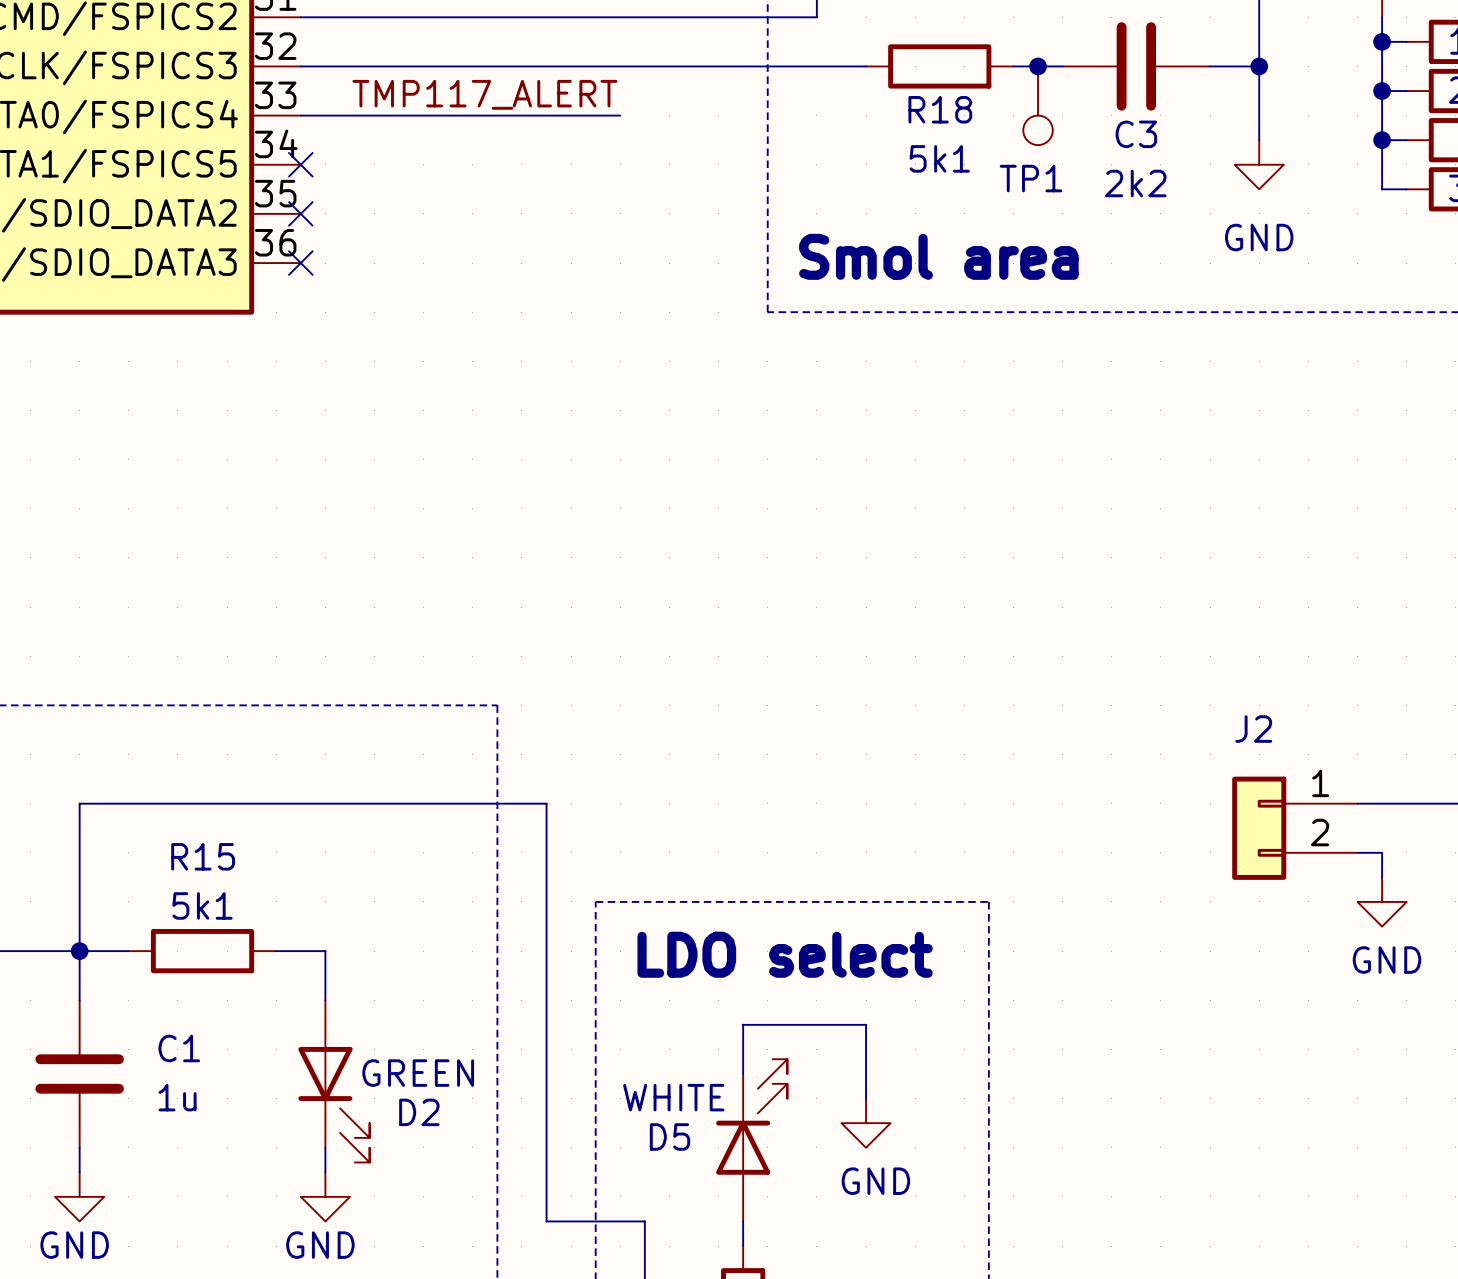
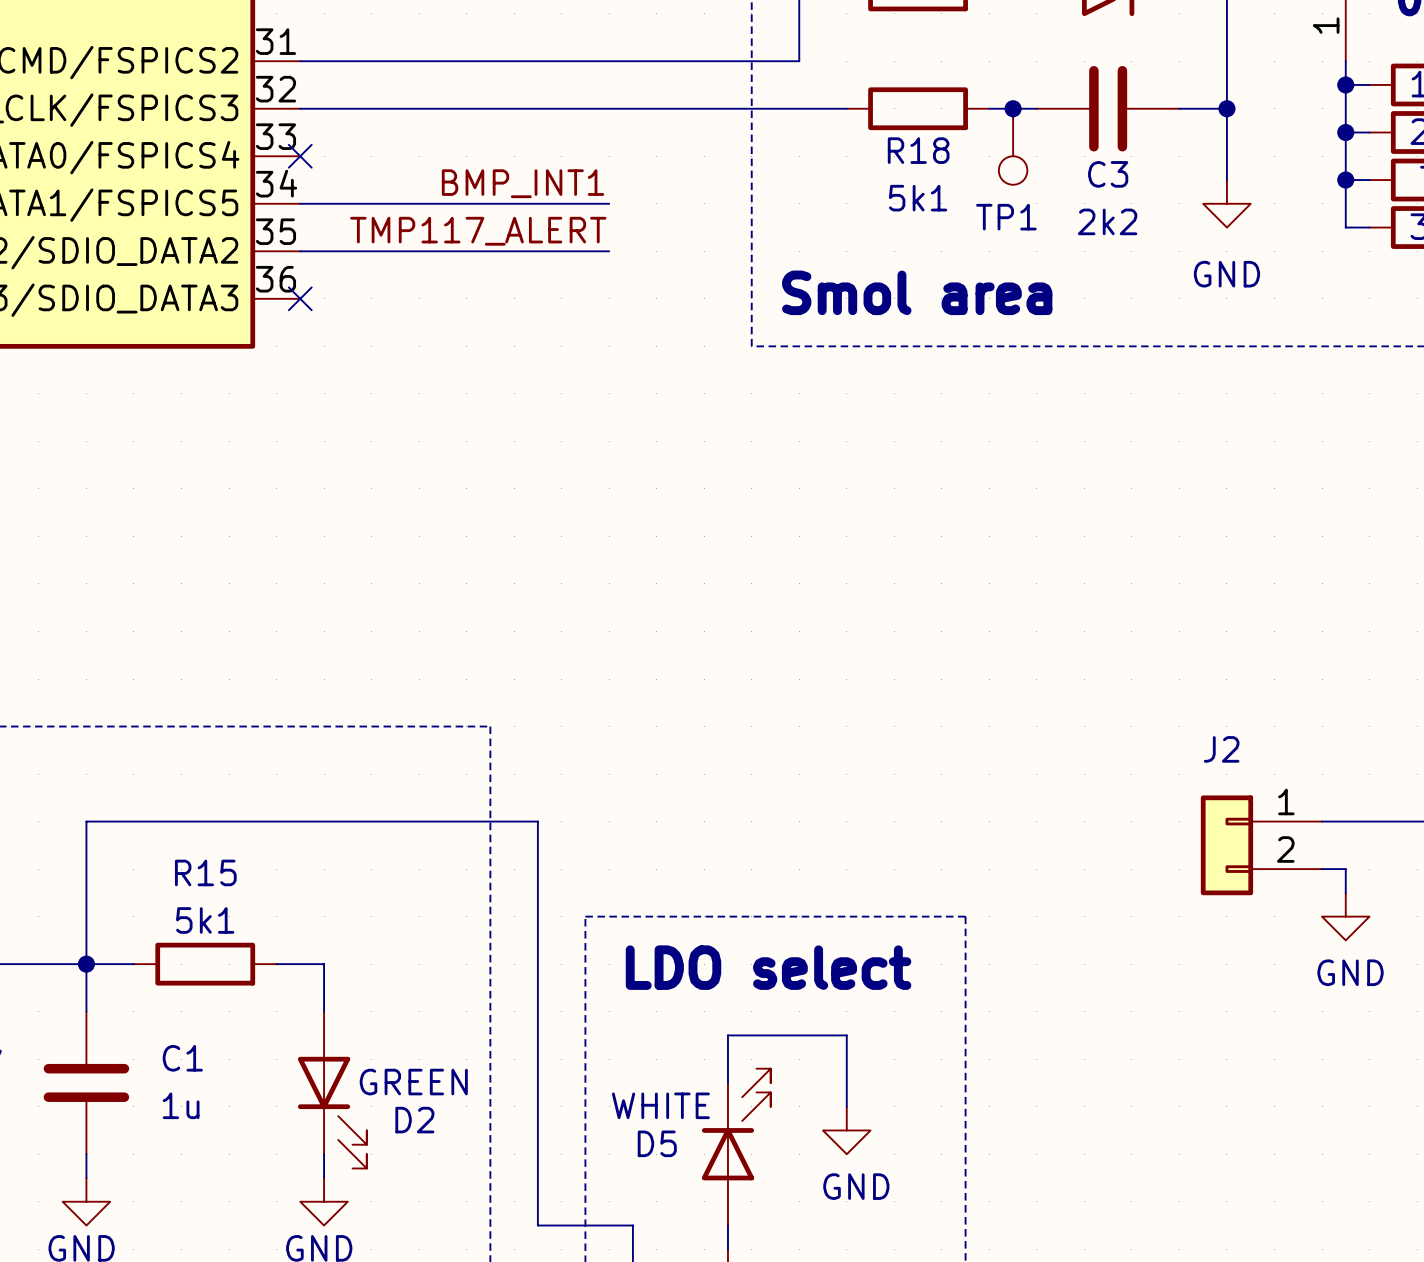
label position: TMP117_ALERT (484, 94) -> TMP117_ALERT (478, 231)
wire: (300, 115) (620, 115) -> (300, 203) (609, 203)
no-connect mark: none -> (300, 156)
label: none -> BMP_INT1 (523, 183)
no-connect mark: (300, 164) -> none
wire: none -> (300, 251) (609, 251)
no-connect mark: (300, 213) -> none

